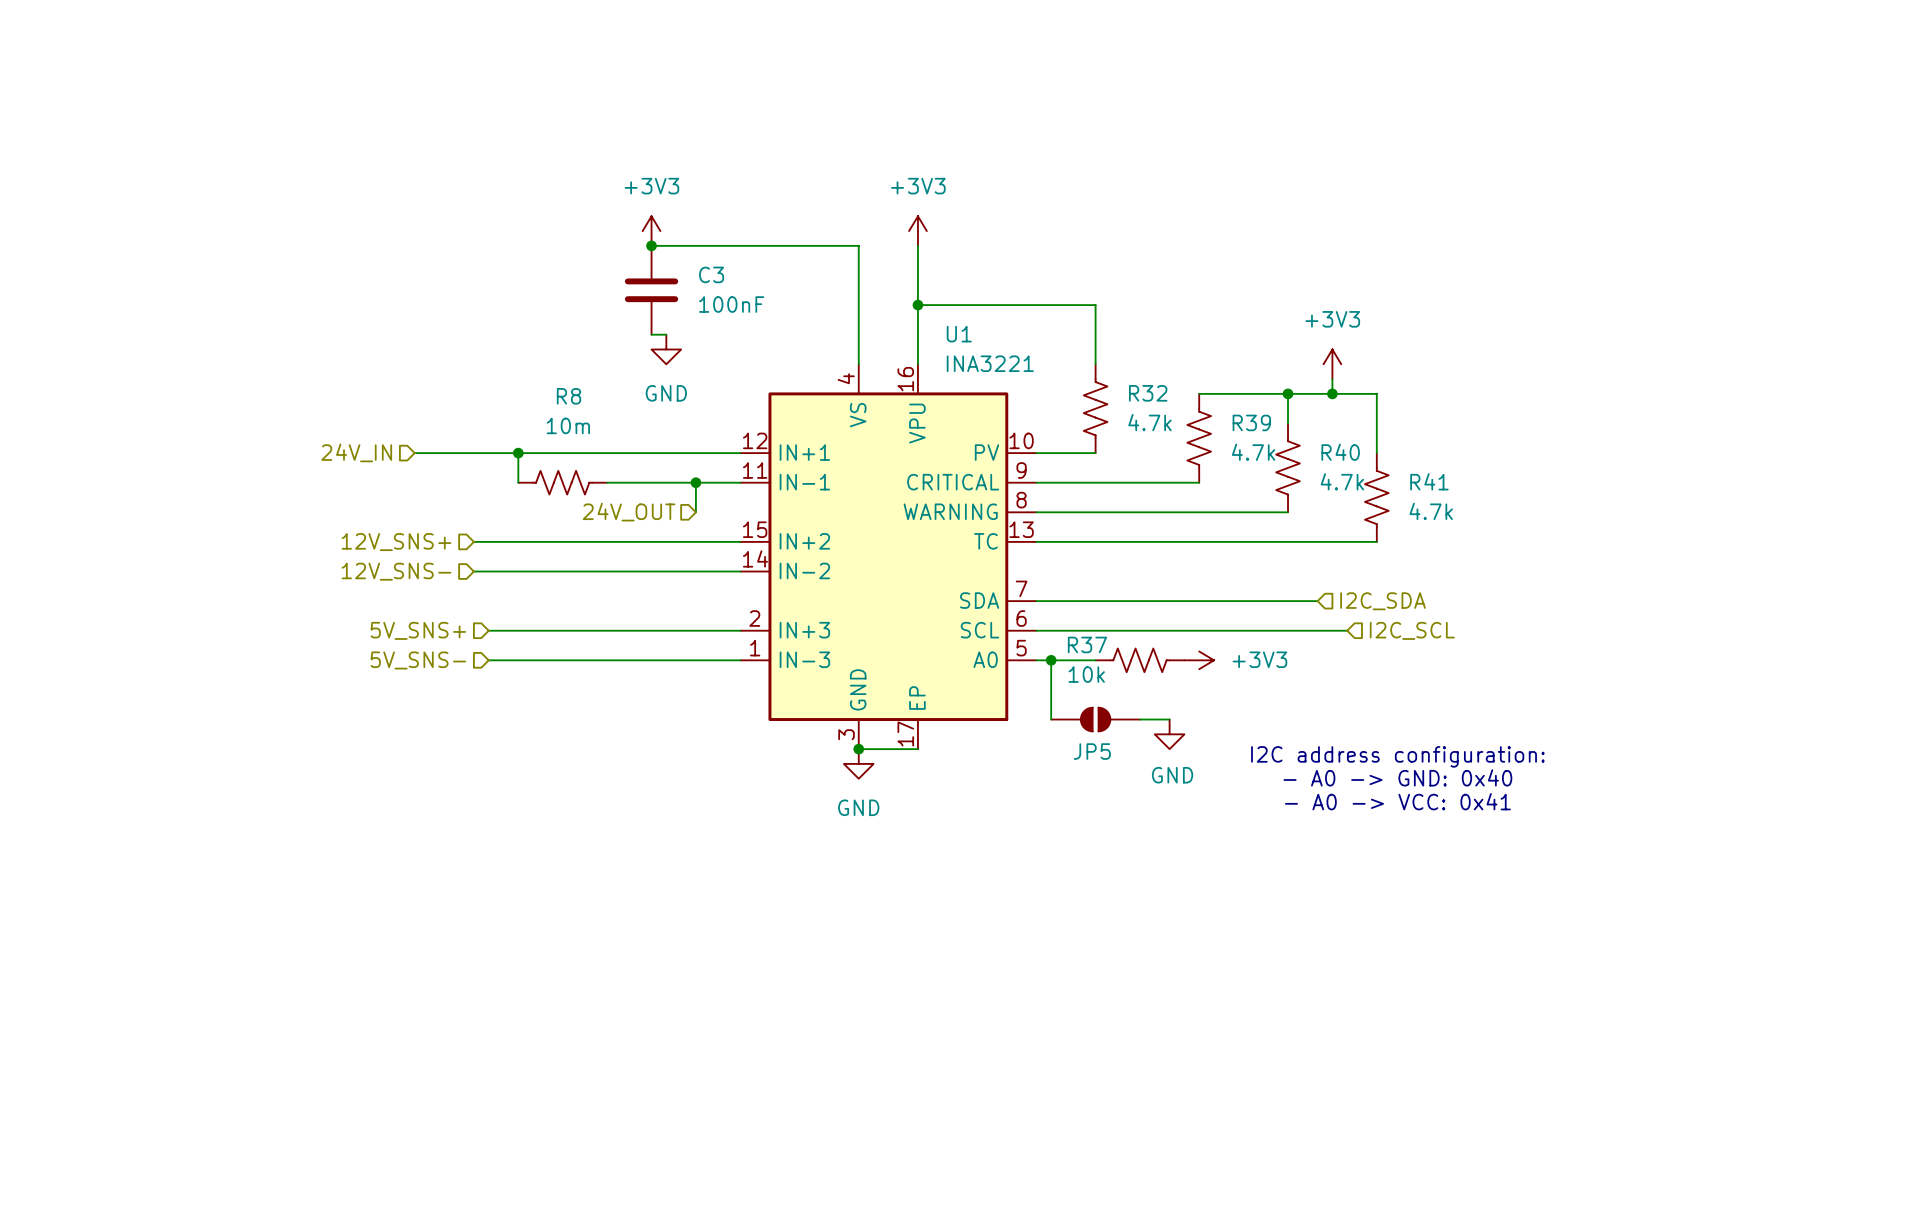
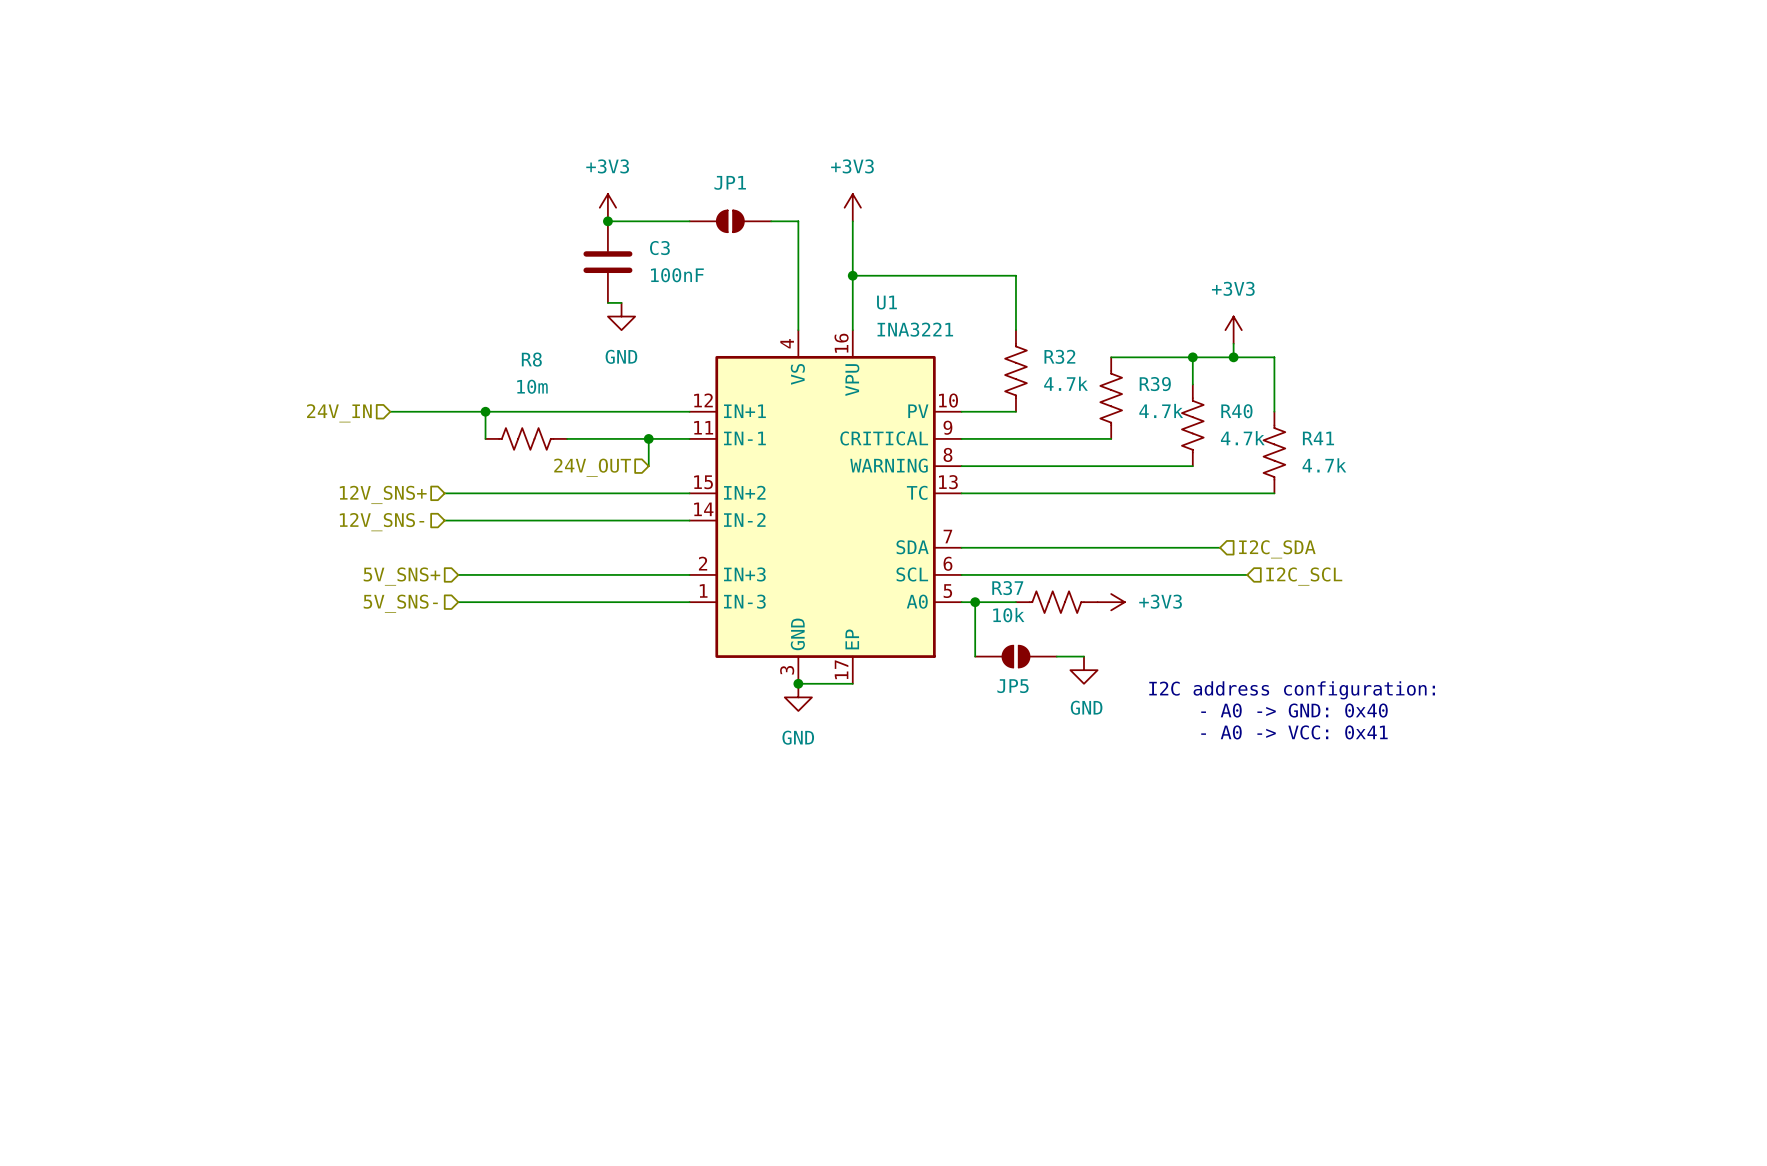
JP1: none -> (730, 221)

